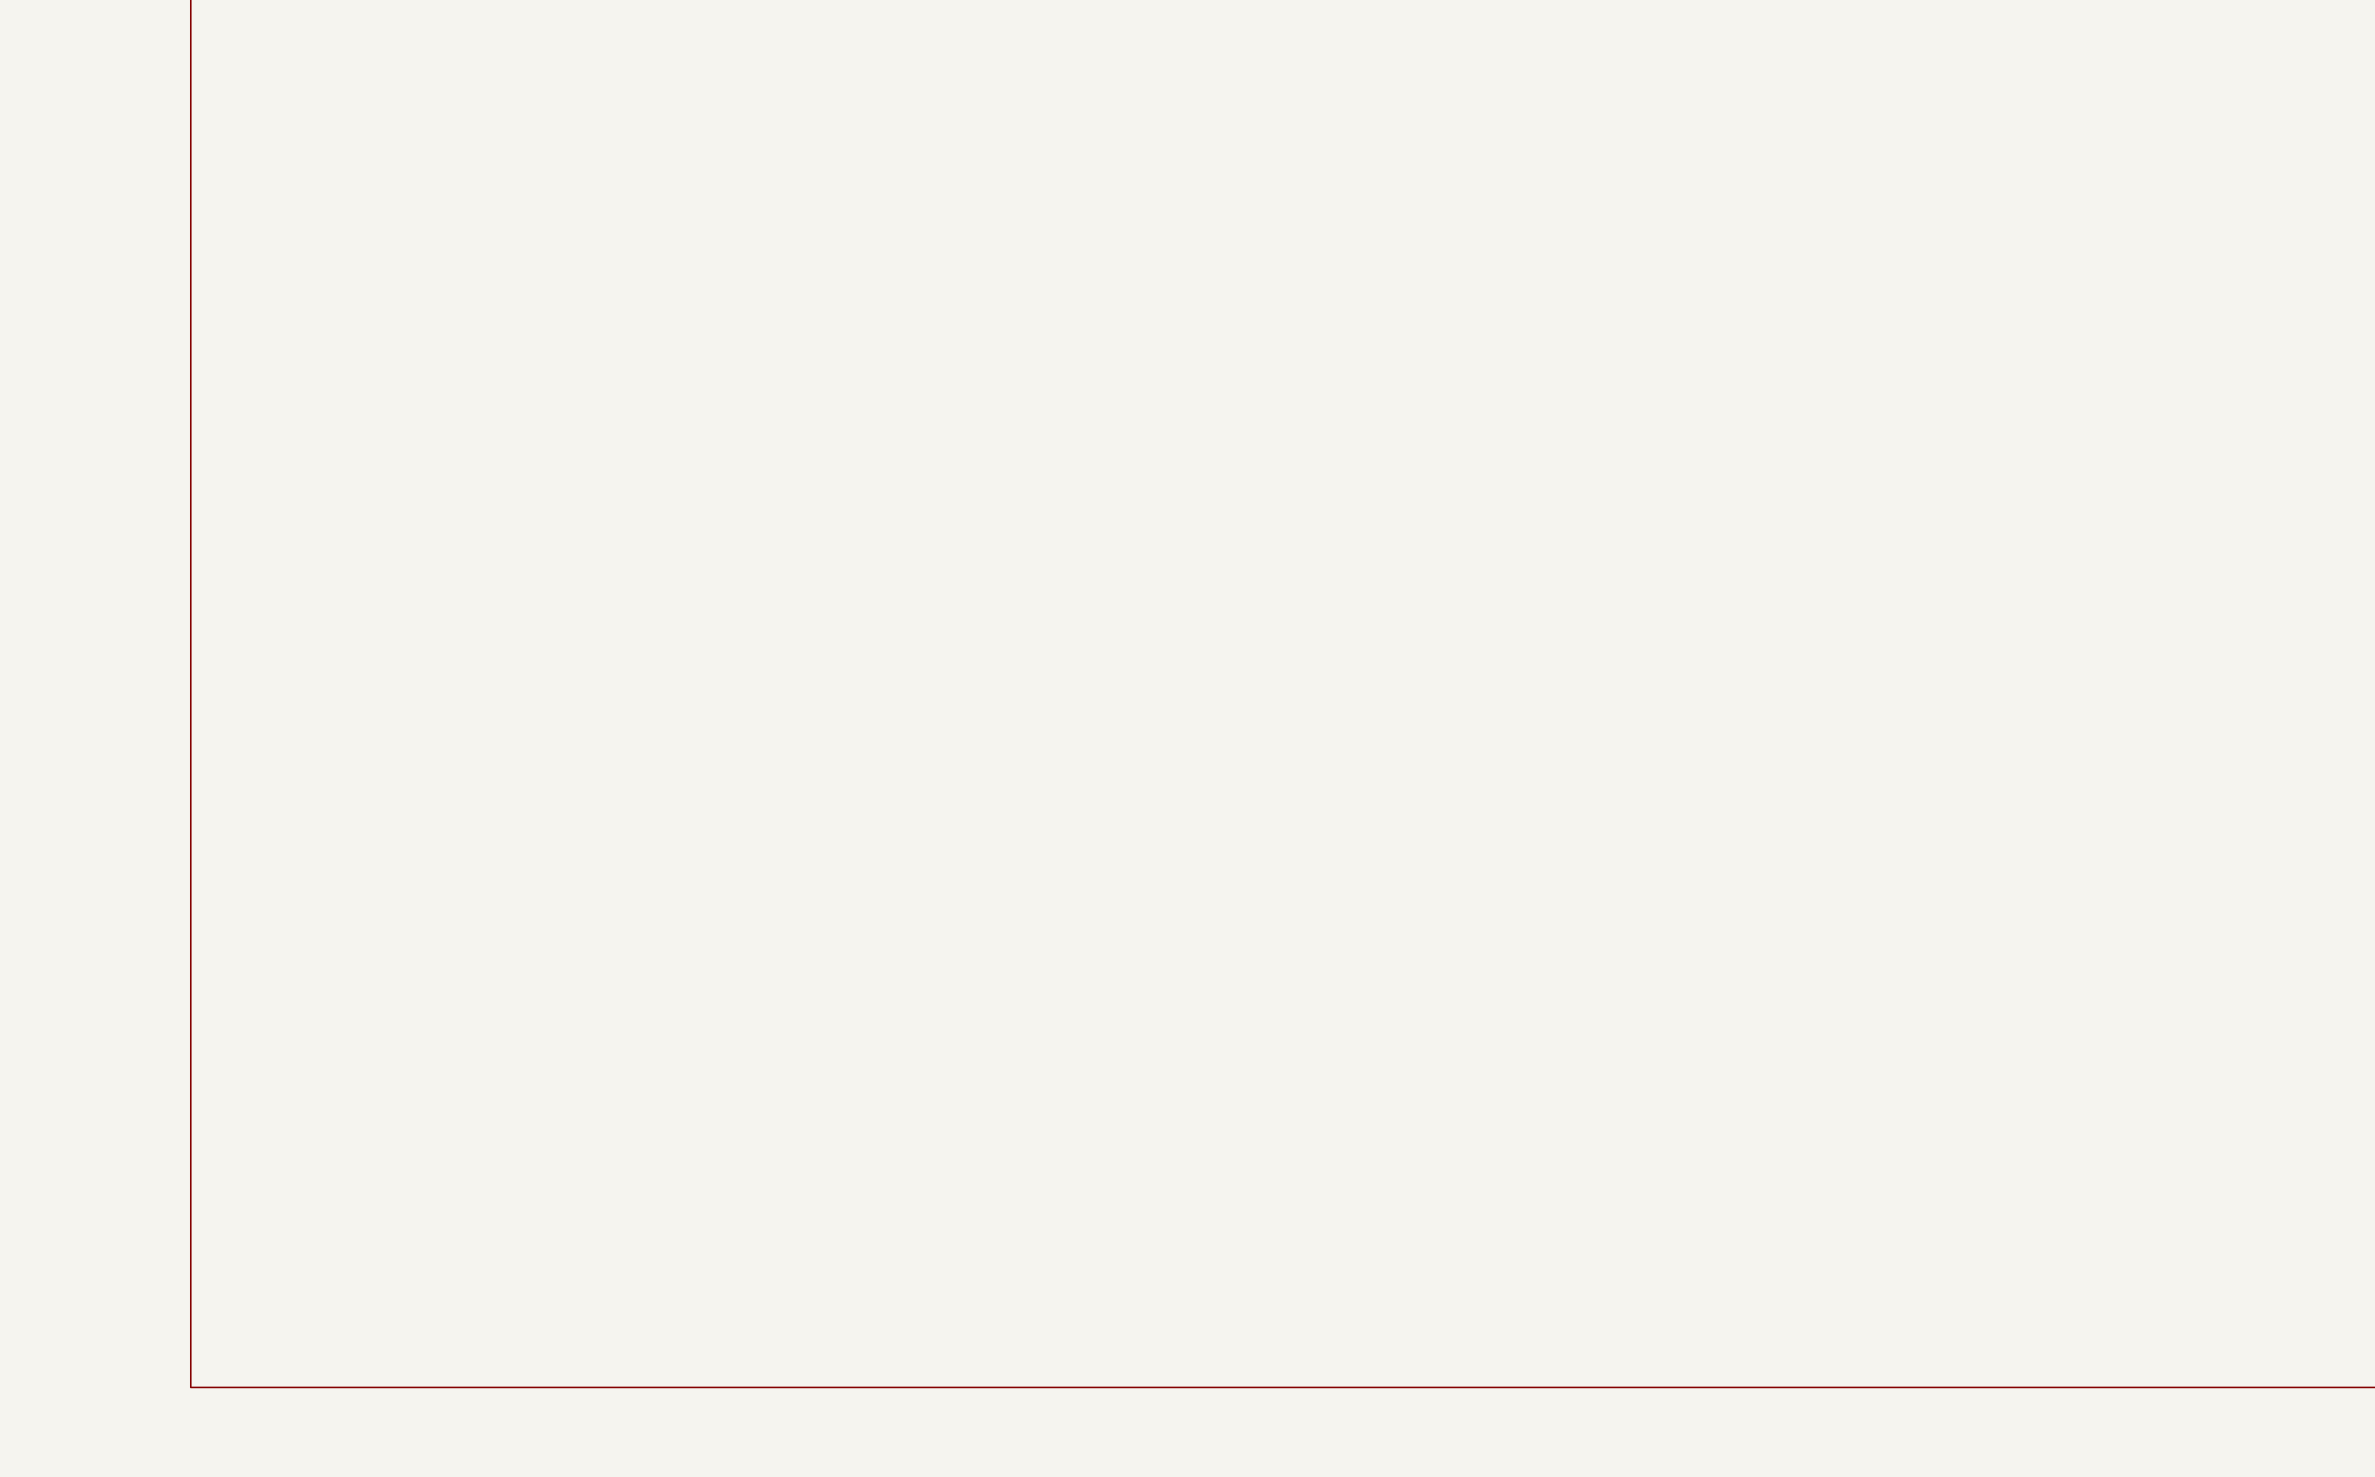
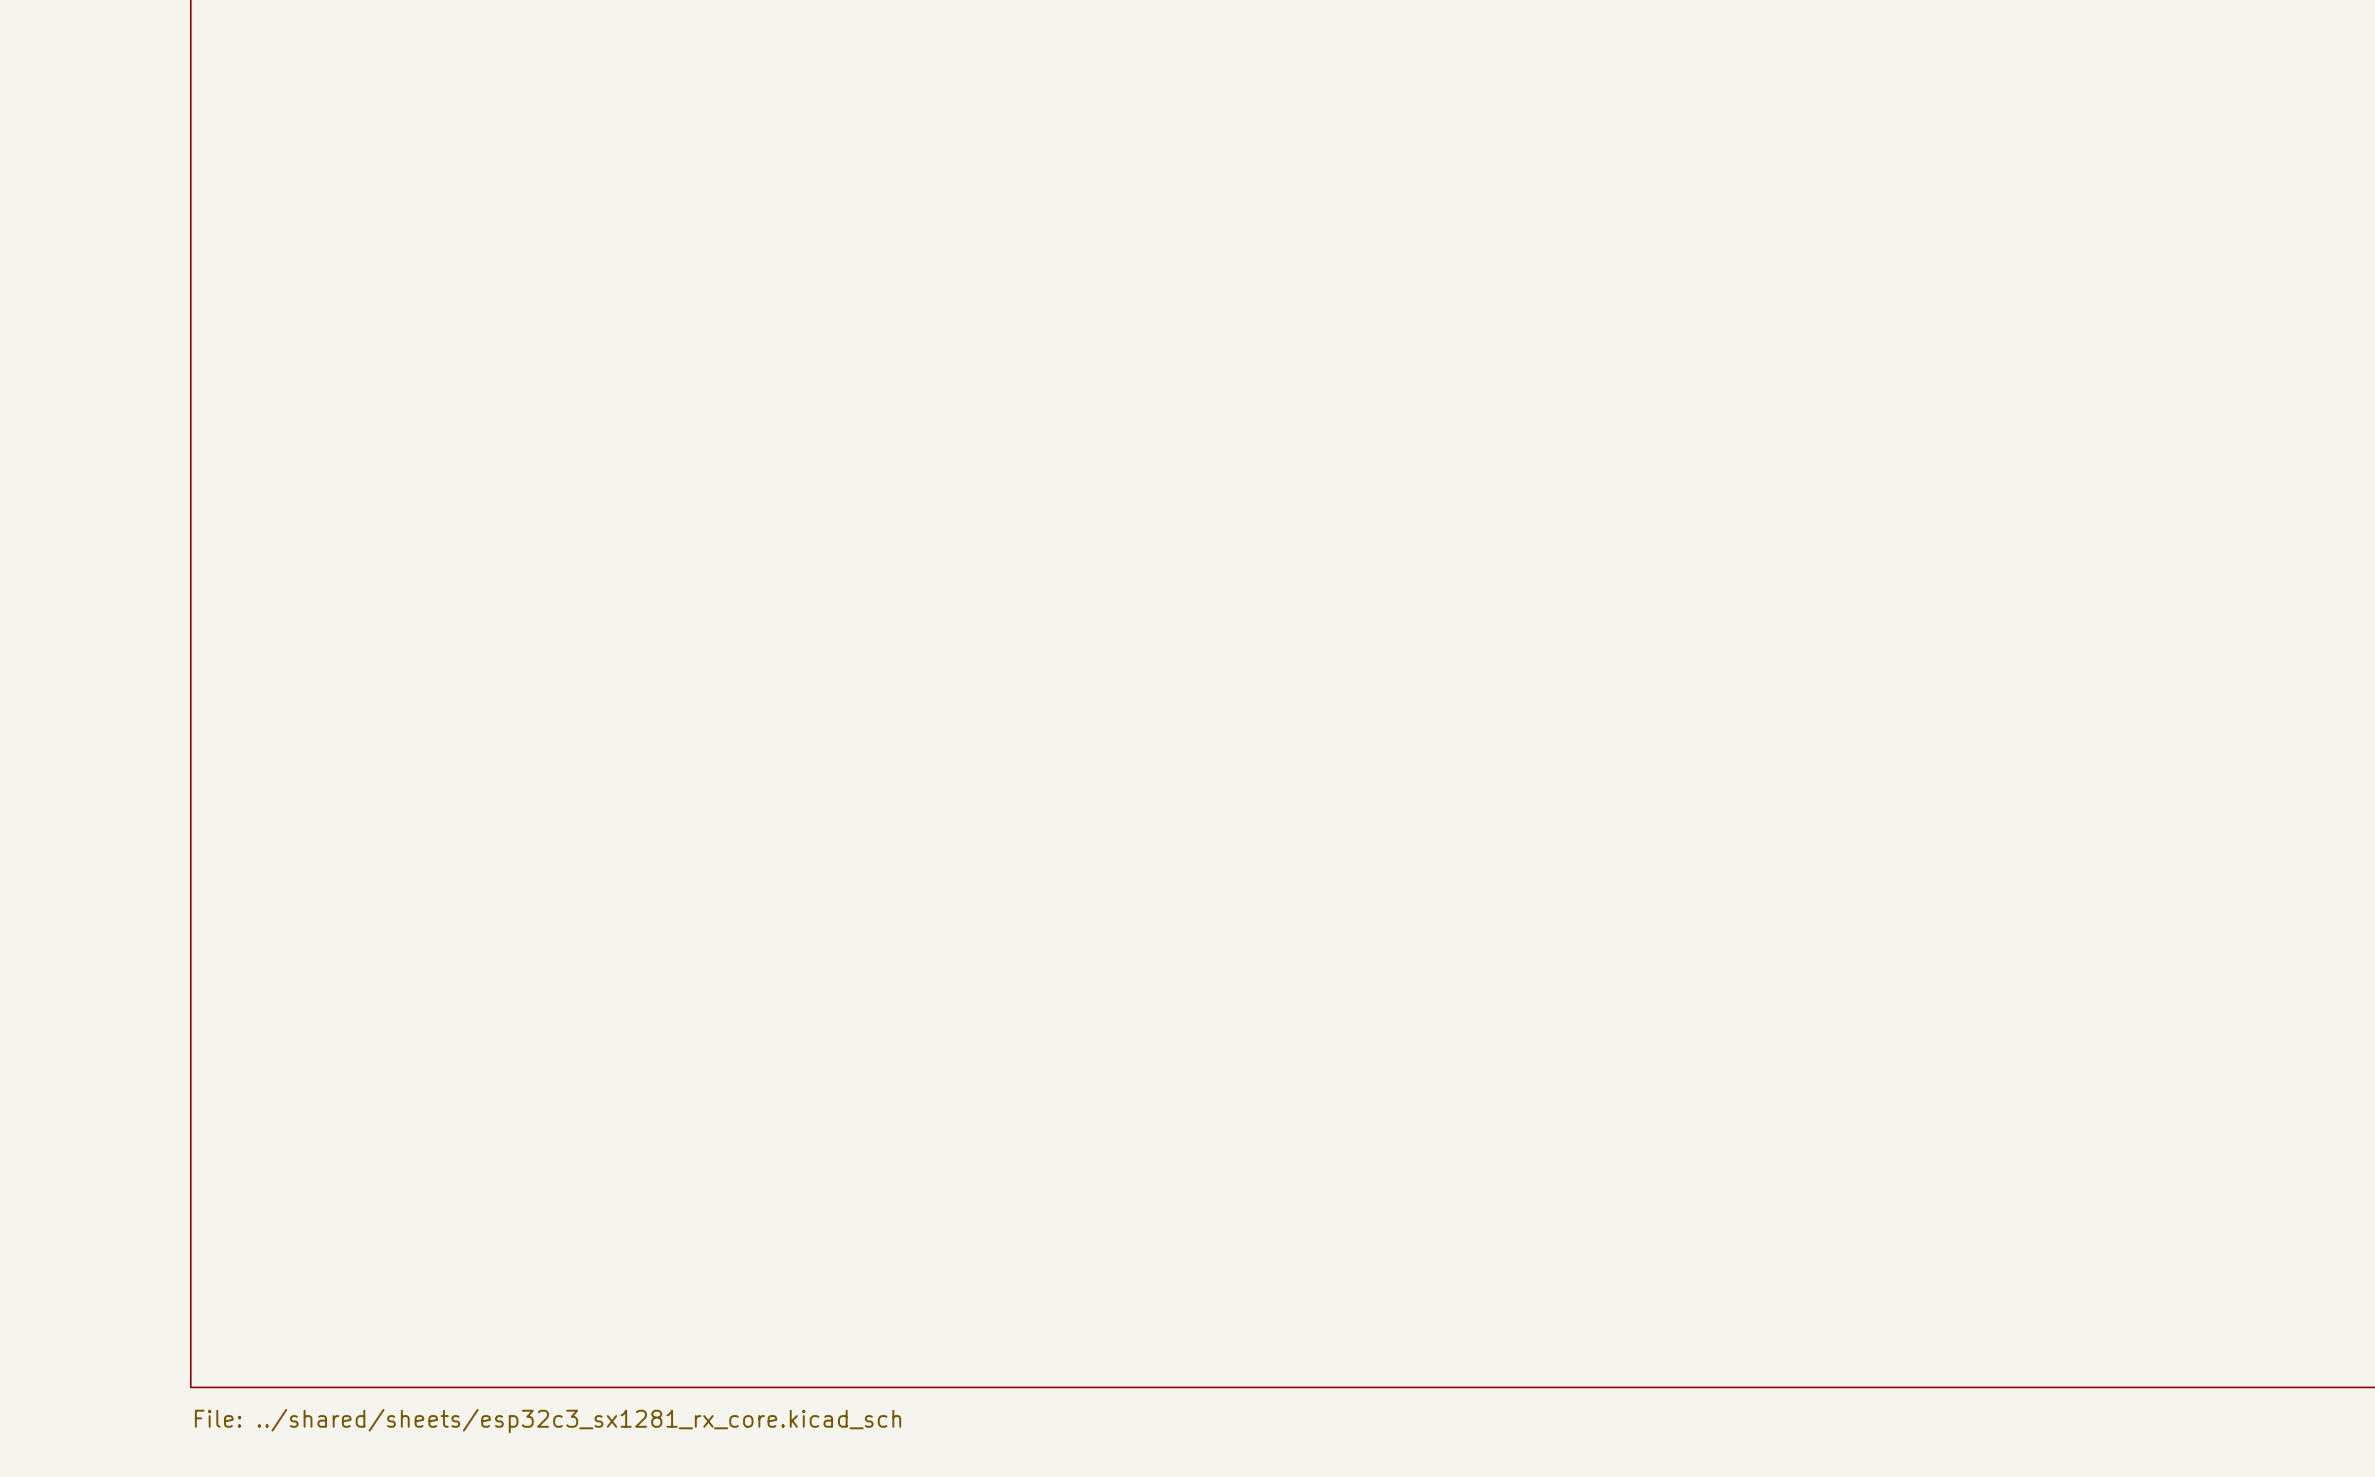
sheet value: none -> File: ../shared/sheets/esp32c3_sx1281_rx_core.kicad_sch (548, 1421)

